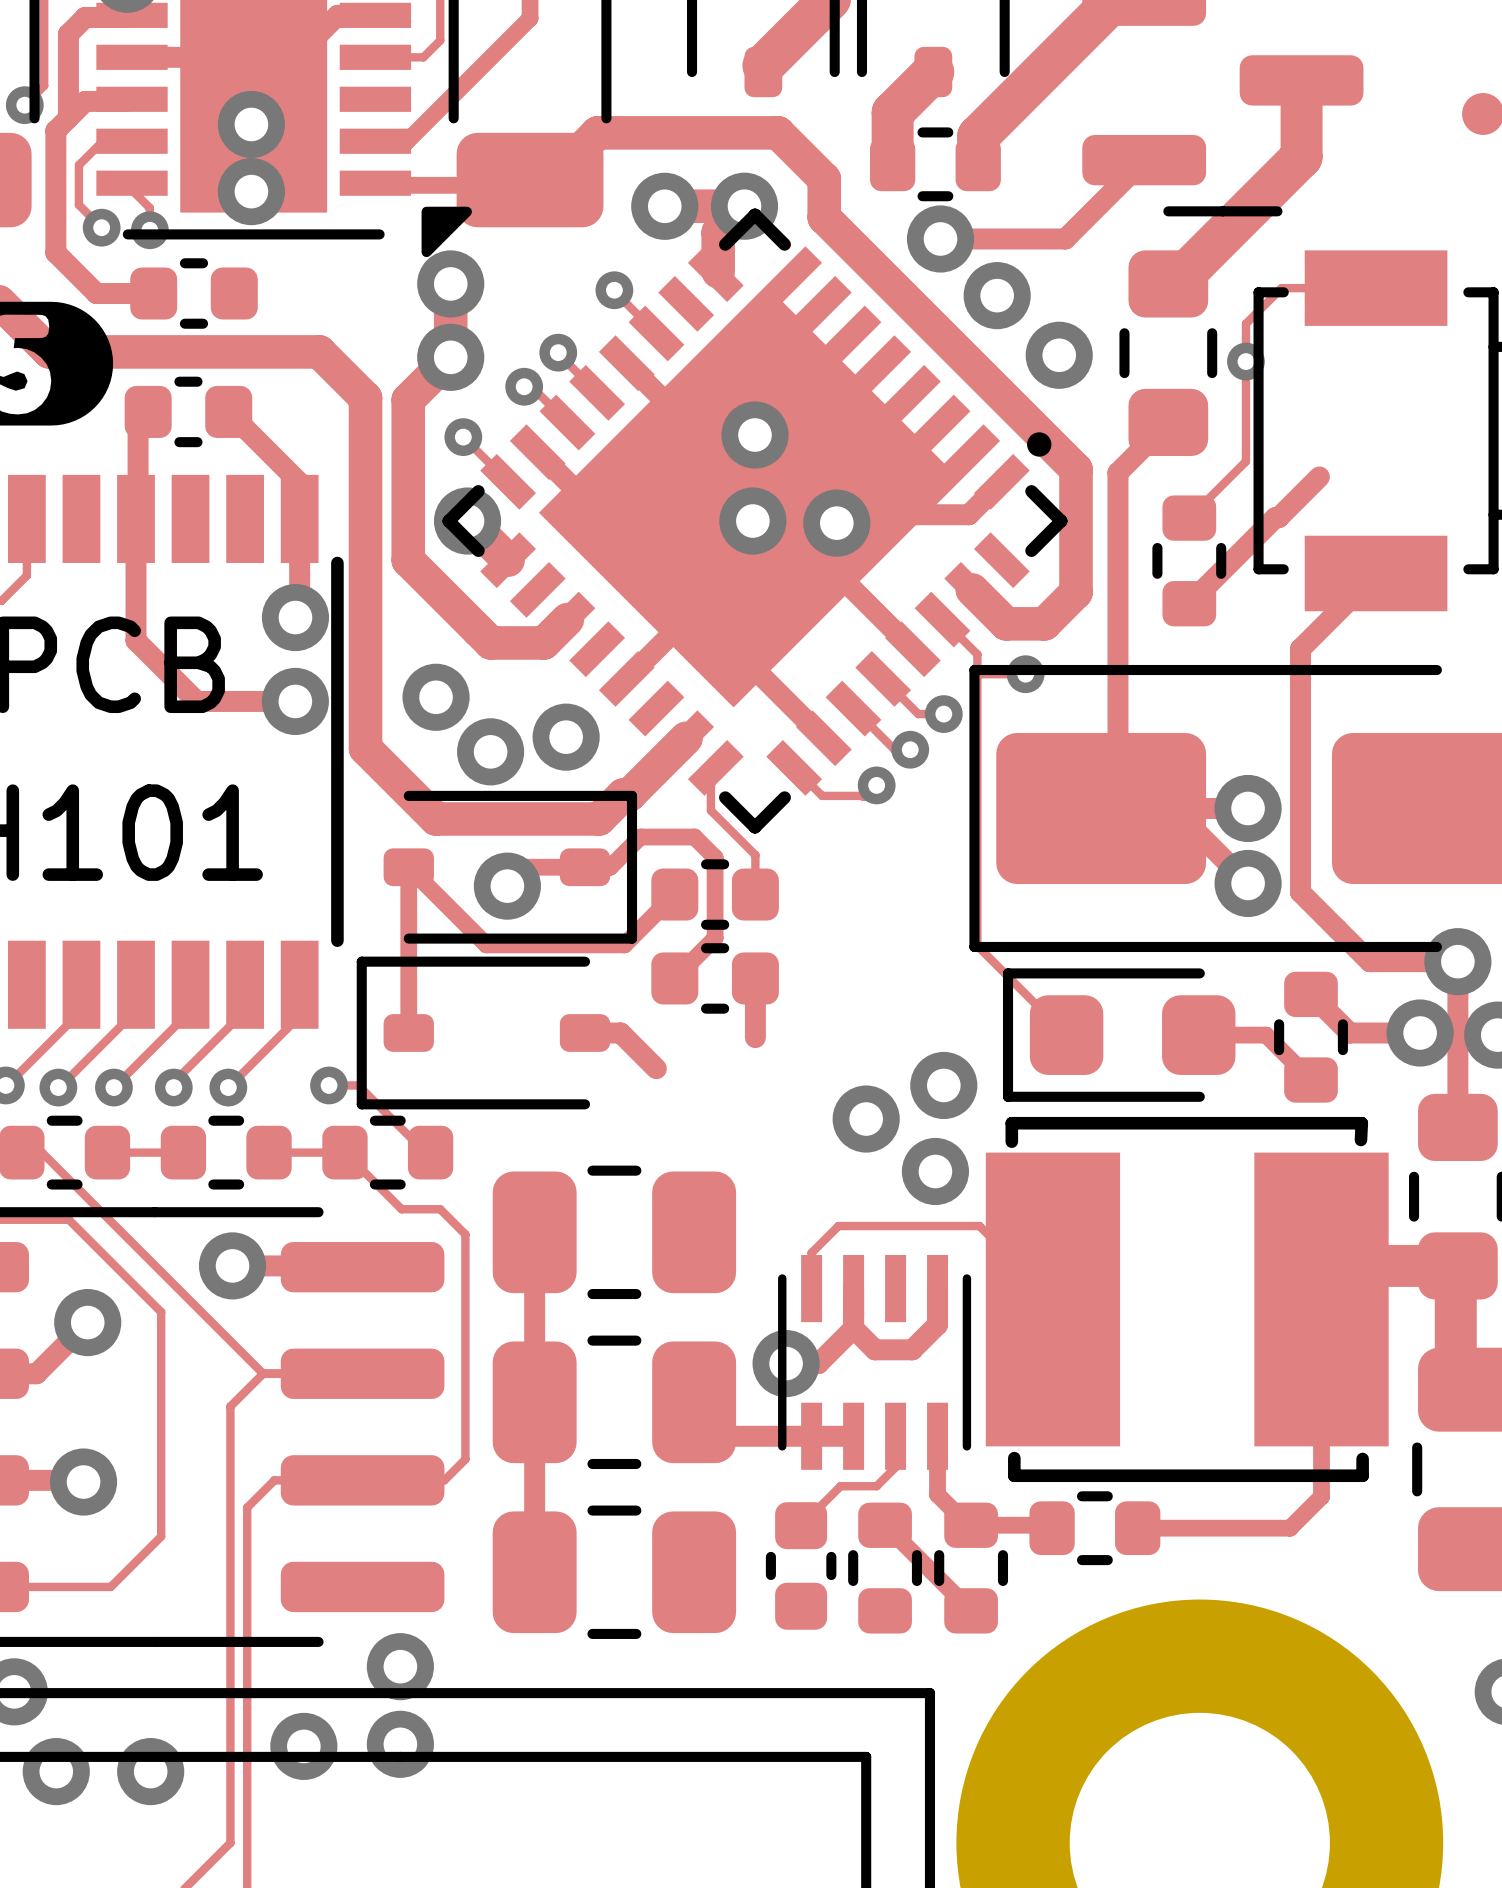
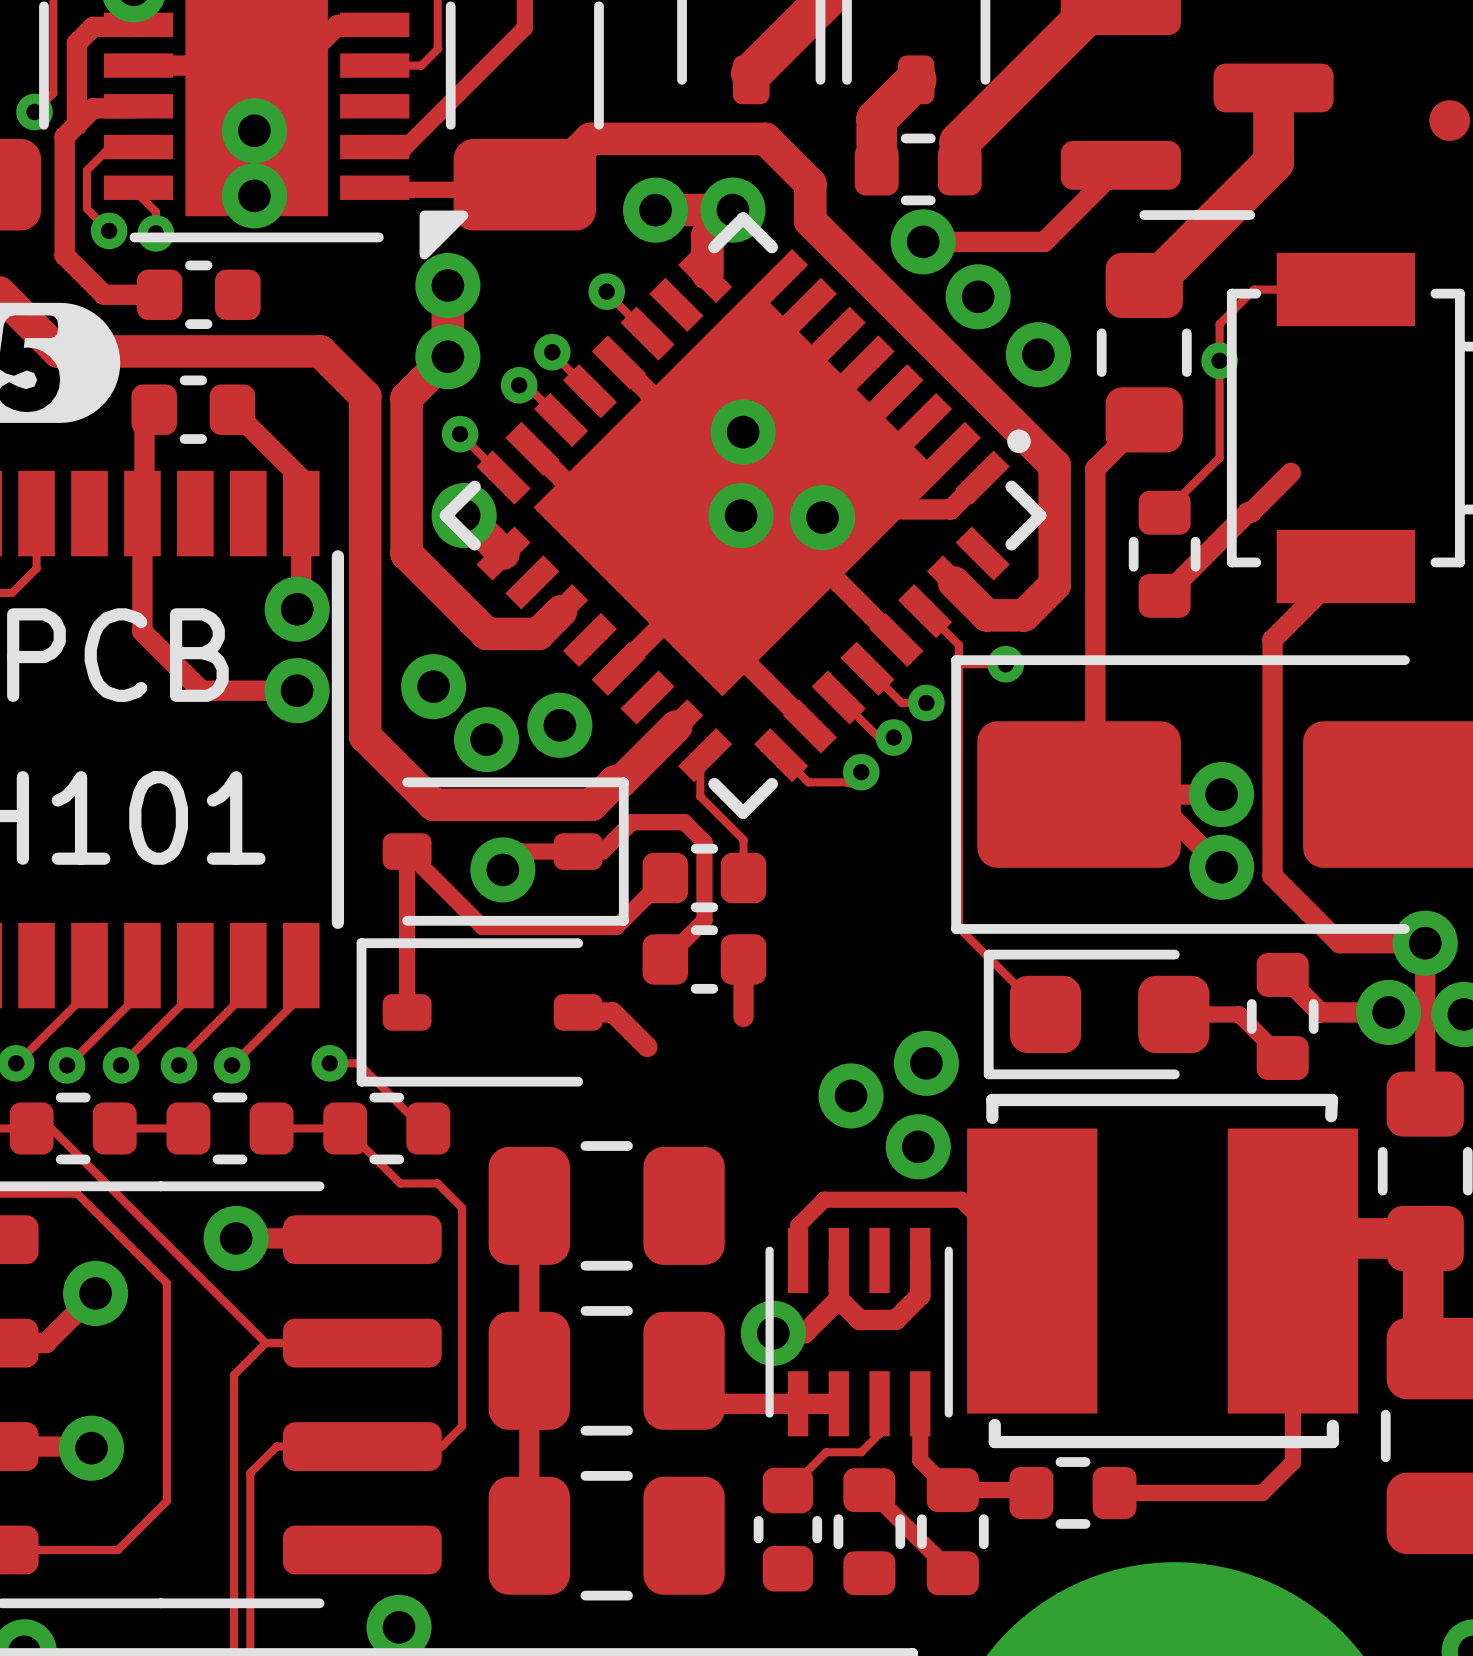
track width: thin (811, 1288) (811, 1252) (838, 1226) (979, 1226) (1052, 1299) -> thick (798, 1260) (798, 1225) (824, 1199) (961, 1199) (1032, 1271)

